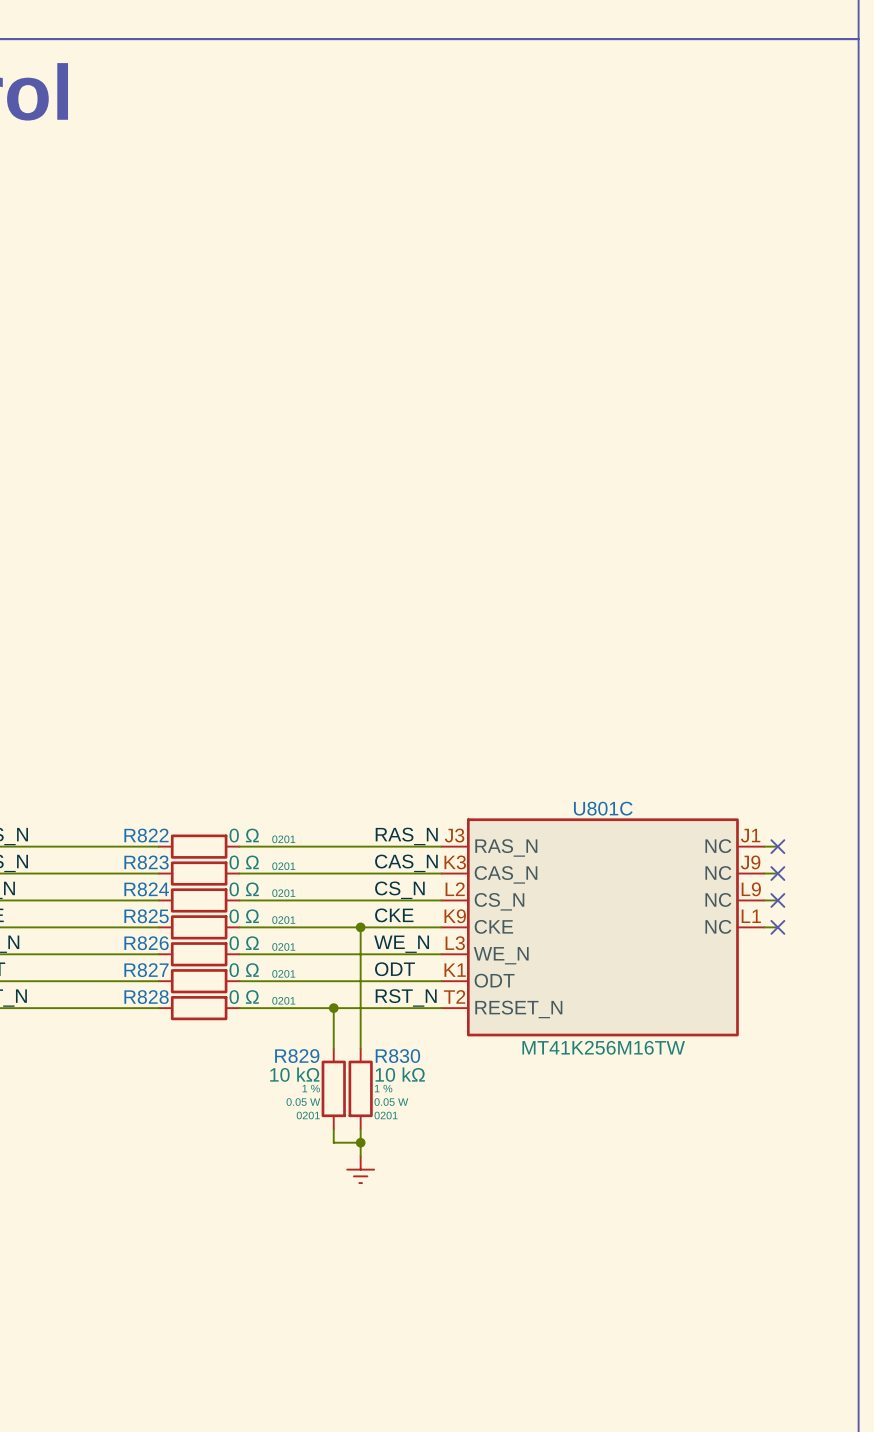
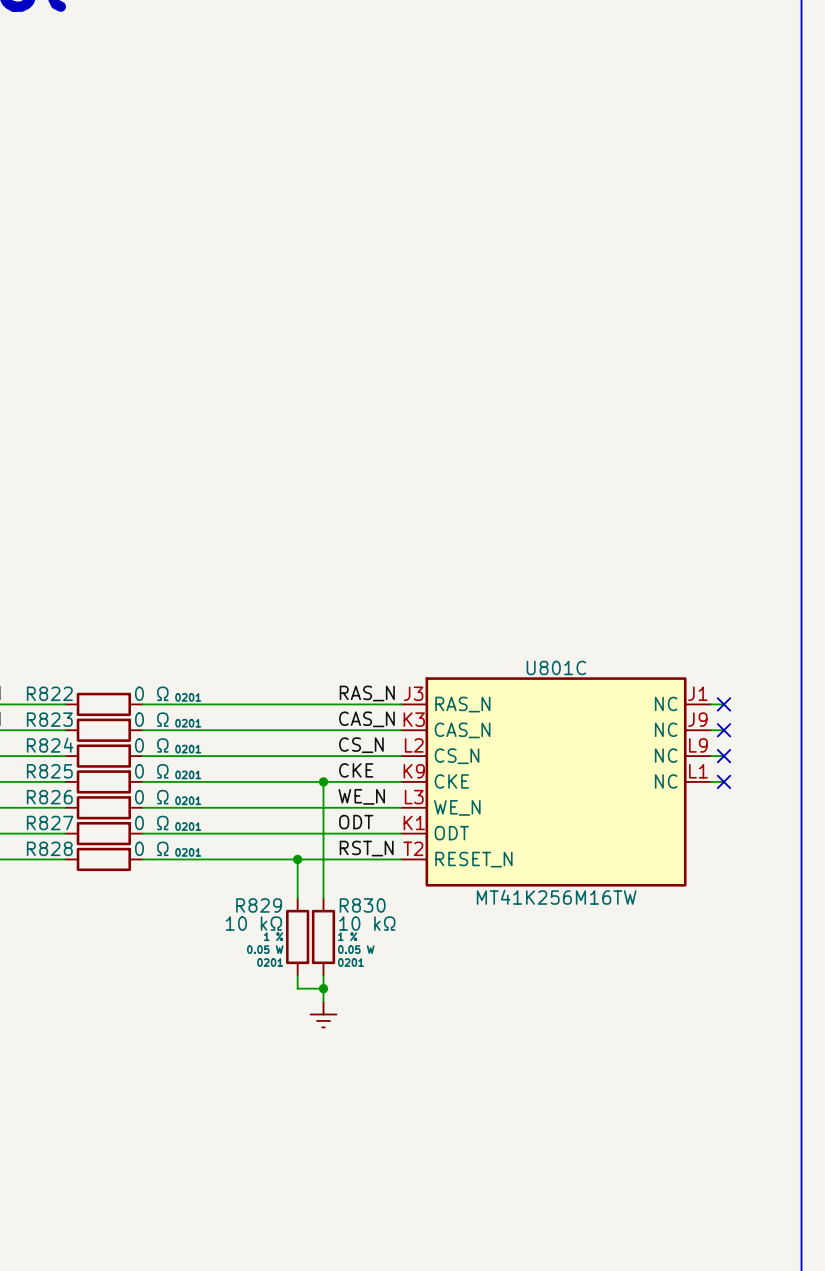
wire: (91, 846) (158, 846) -> (142, 704) (207, 704)
R822 position: (199, 846) -> (103, 704)
wire: (91, 873) (158, 873) -> (142, 730) (207, 730)
R823 position: (199, 873) -> (103, 730)
wire: (91, 900) (158, 900) -> (142, 756) (207, 756)
R824 position: (199, 900) -> (103, 756)
wire: (91, 927) (158, 927) -> (142, 781) (207, 781)
R825 position: (199, 927) -> (103, 781)
wire: (91, 954) (158, 954) -> (142, 807) (207, 807)
R826 position: (199, 954) -> (103, 807)
wire: (91, 981) (158, 981) -> (142, 833) (207, 833)
R827 position: (199, 981) -> (103, 833)
wire: (91, 1008) (158, 1008) -> (142, 859) (207, 859)
R828 position: (199, 1008) -> (103, 859)

